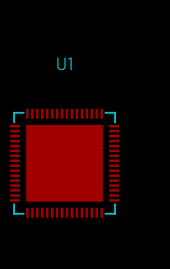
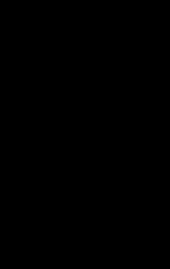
U1: (64, 163) -> none

